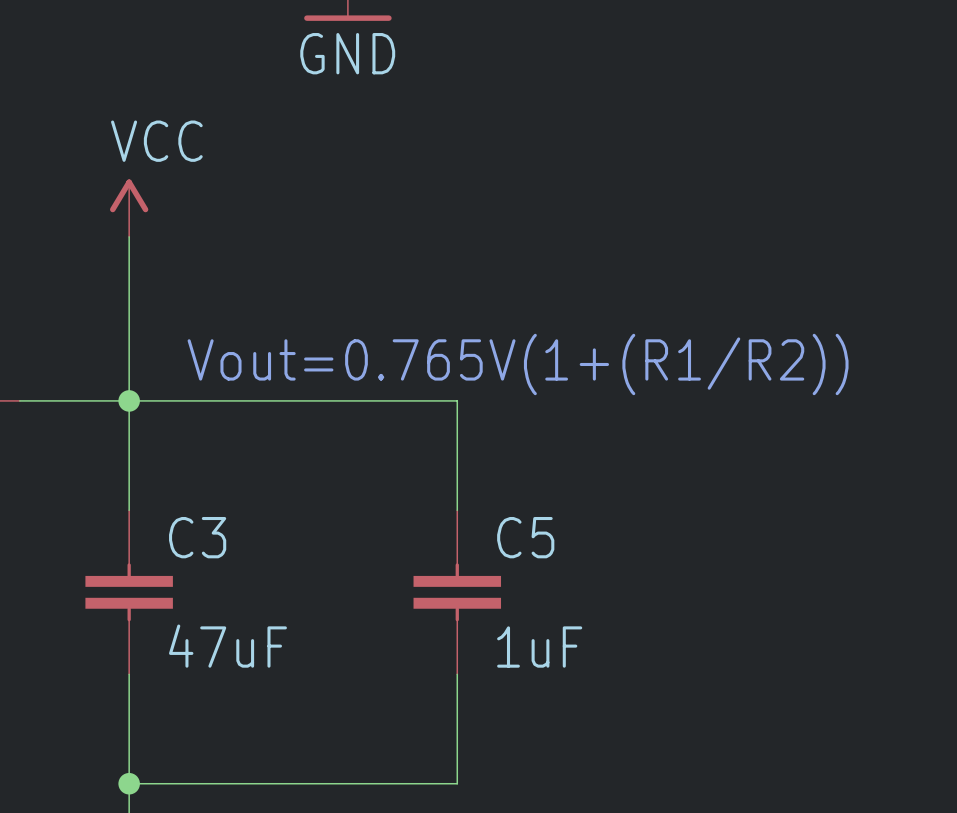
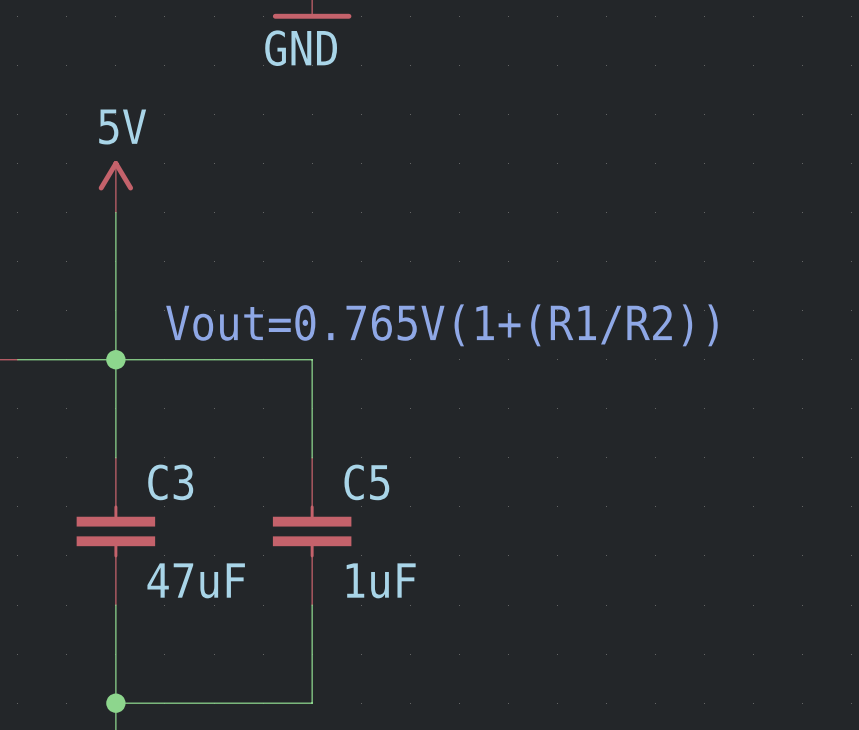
power symbol: VCC (129, 208) -> 5V (115, 186)
wire: (347, 400) (457, 400) (457, 510) -> (312, 359) (312, 457)
C5 position: (457, 592) -> (312, 531)
wire: (457, 674) (457, 783) (347, 783) -> (312, 605) (312, 703)

